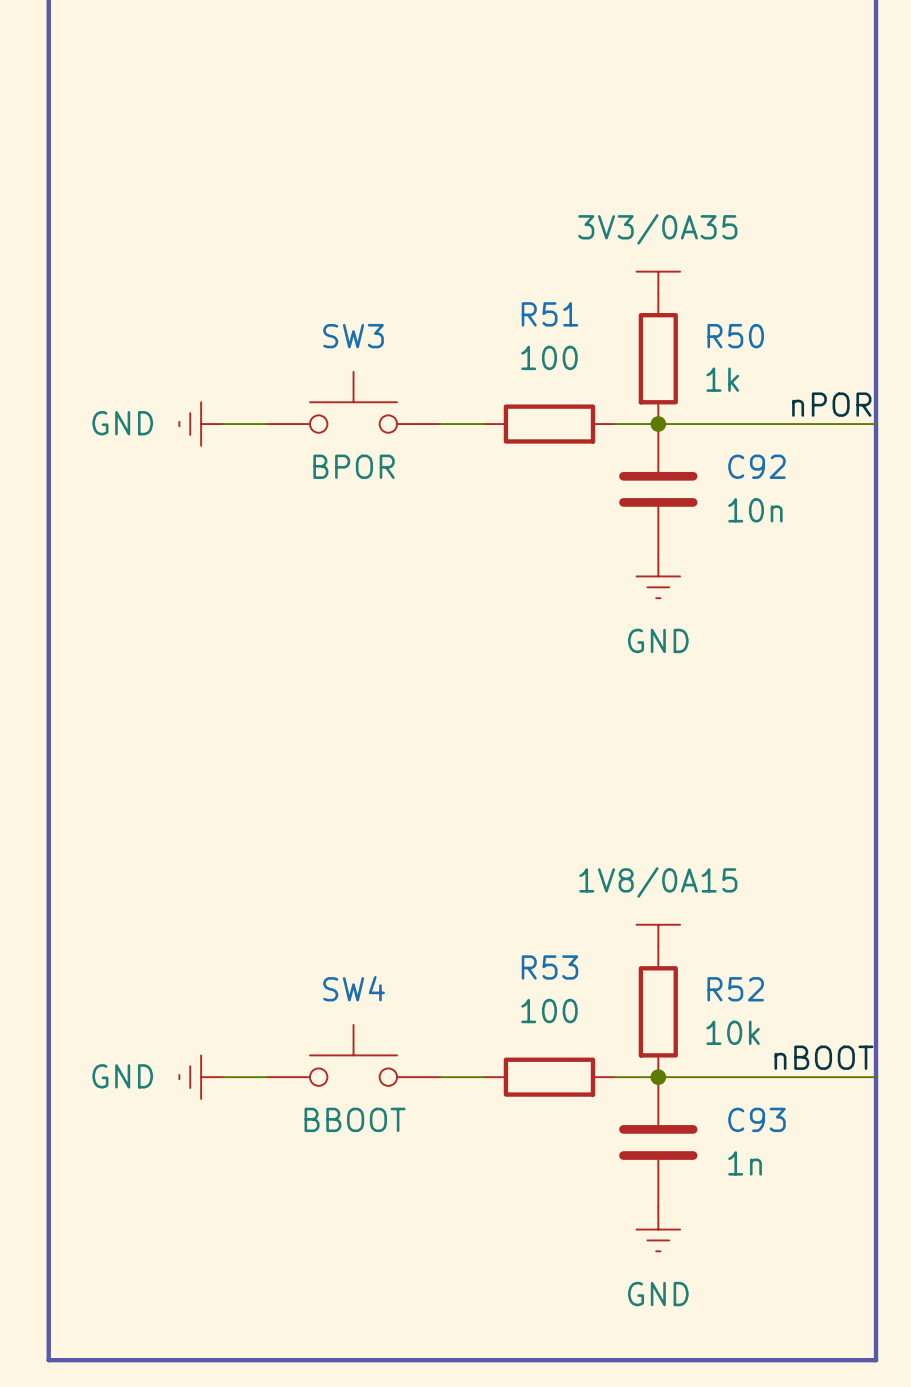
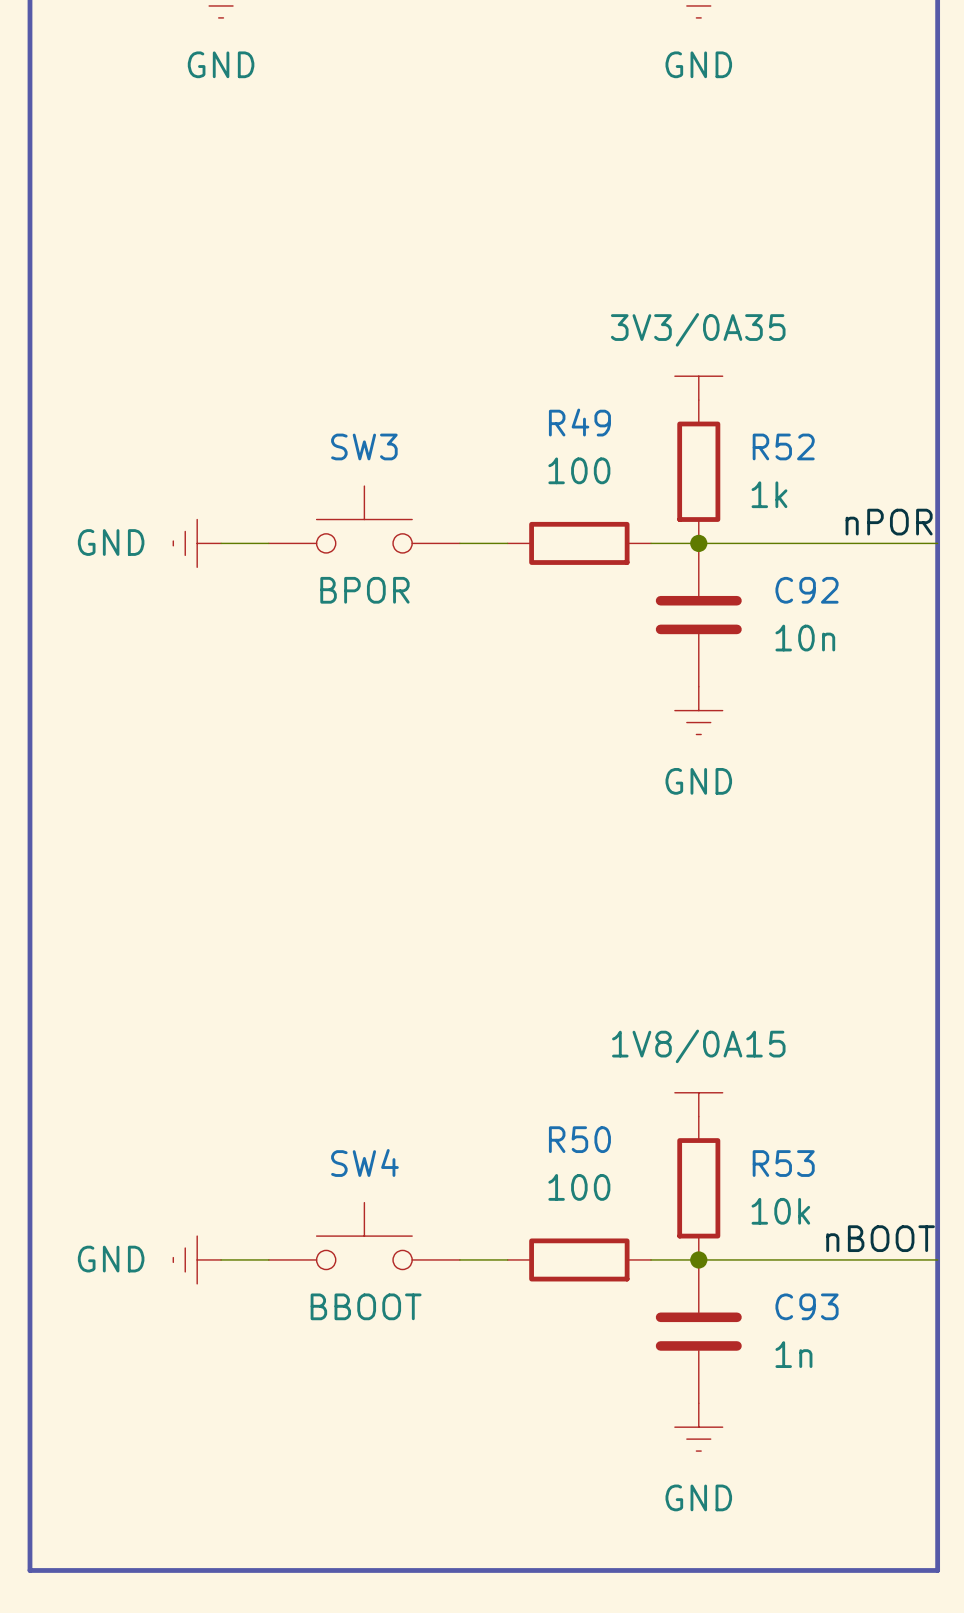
R51 name: R51 (549, 314) -> R49 (579, 422)
R50 name: R50 (735, 336) -> R52 (783, 446)
R53 name: R53 (549, 967) -> R50 (579, 1139)
R52 name: R52 (735, 989) -> R53 (783, 1163)

